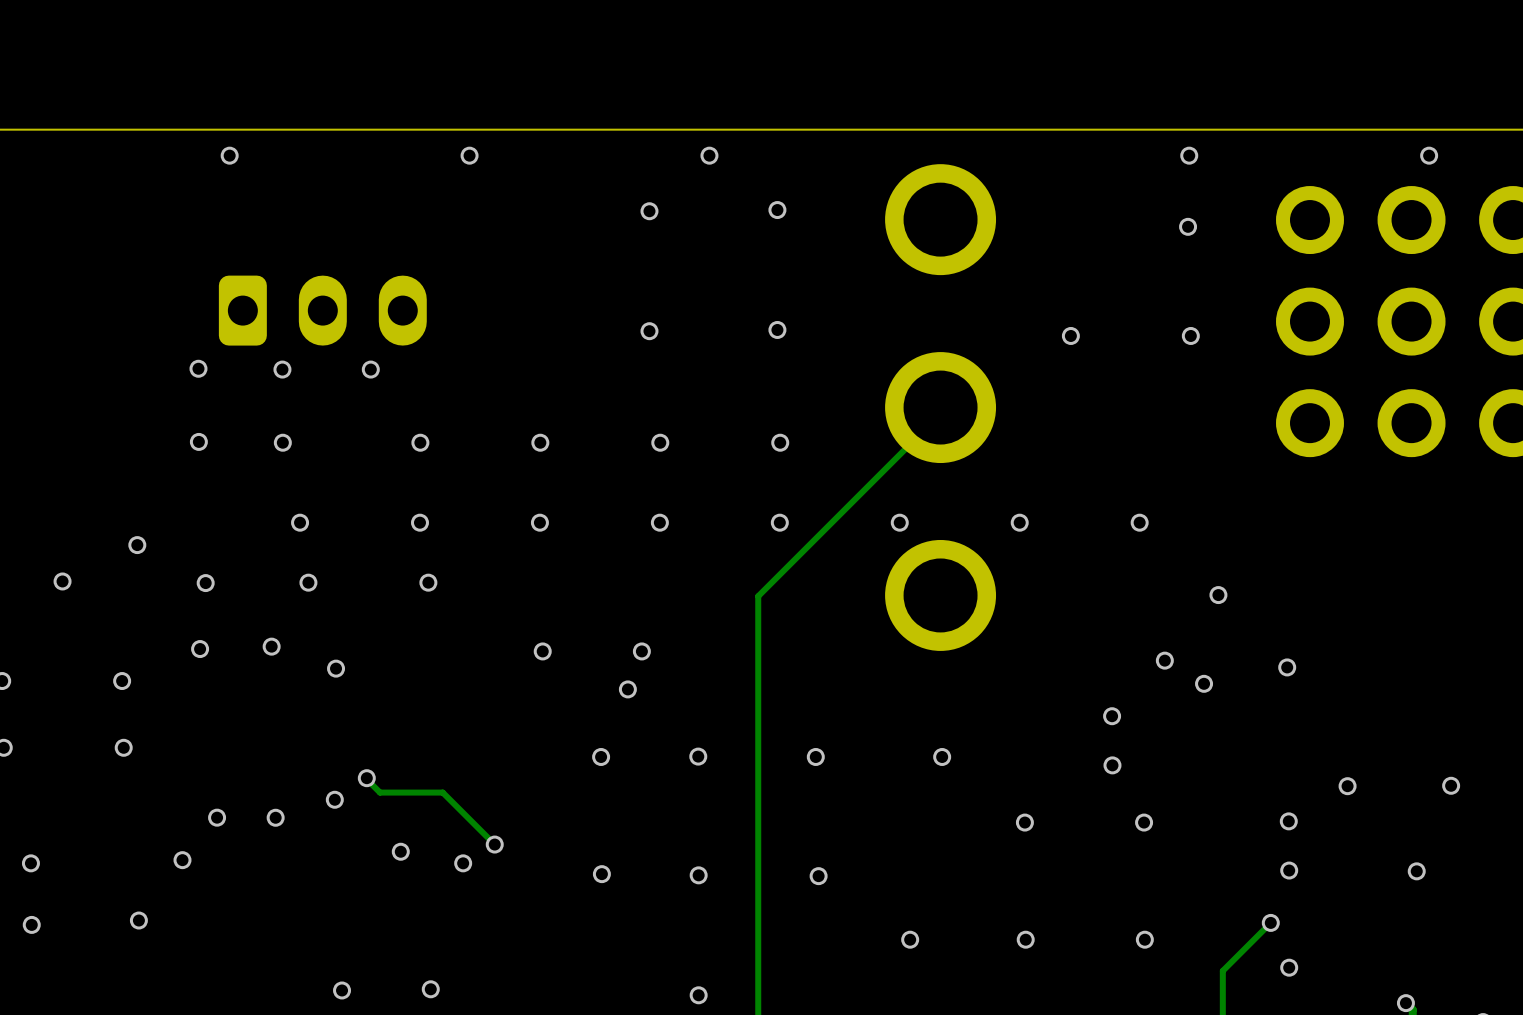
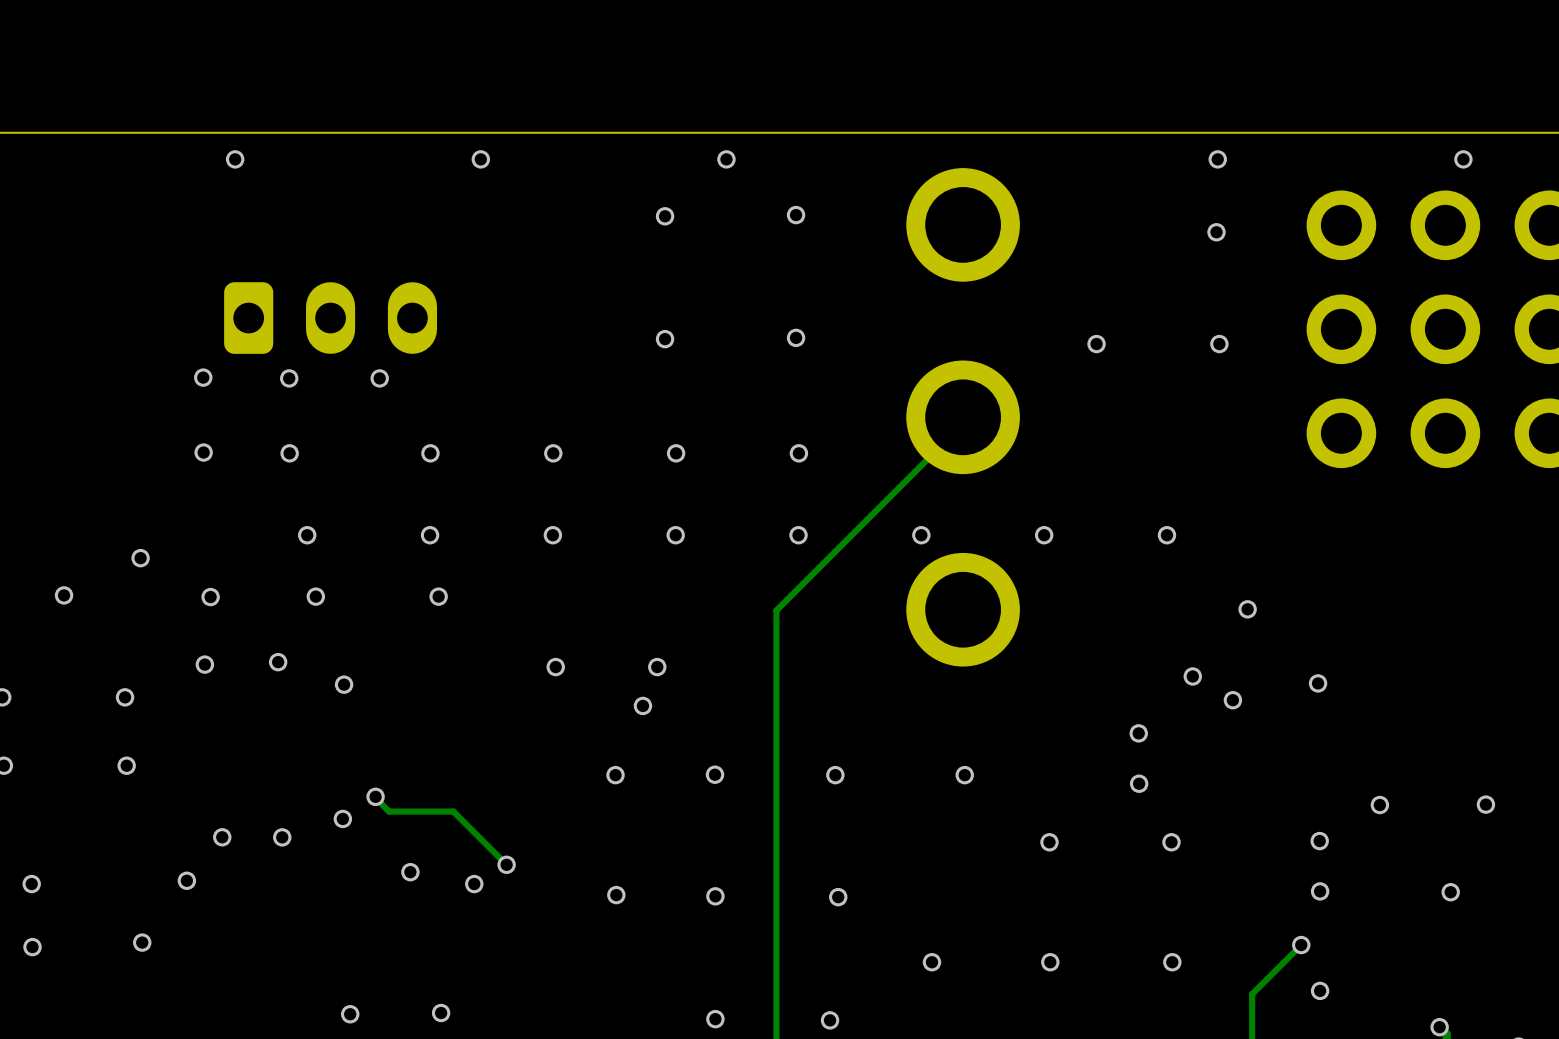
via: none -> (830, 1020)

